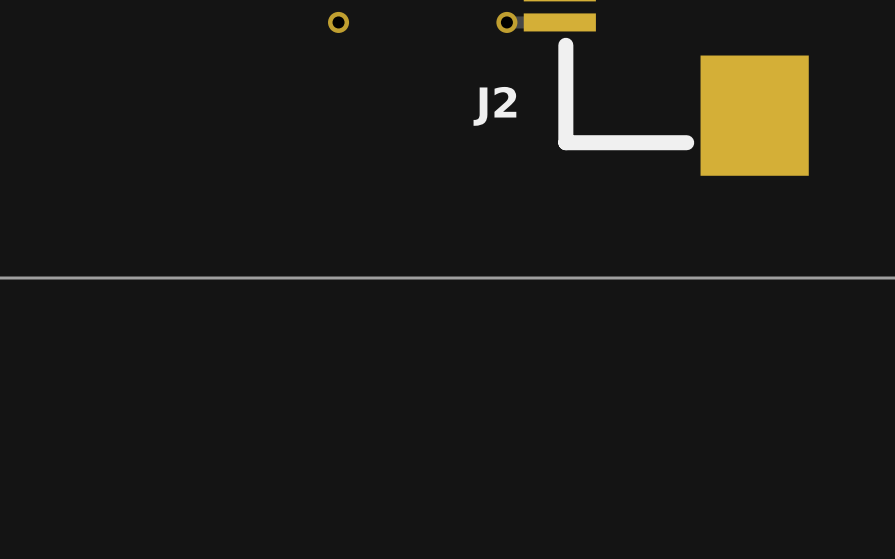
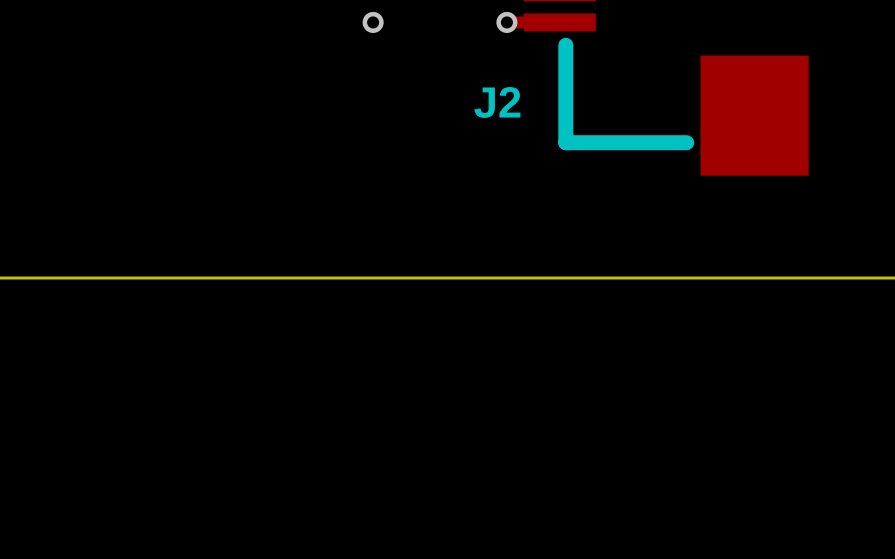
via position: (338, 22) -> (373, 22)

